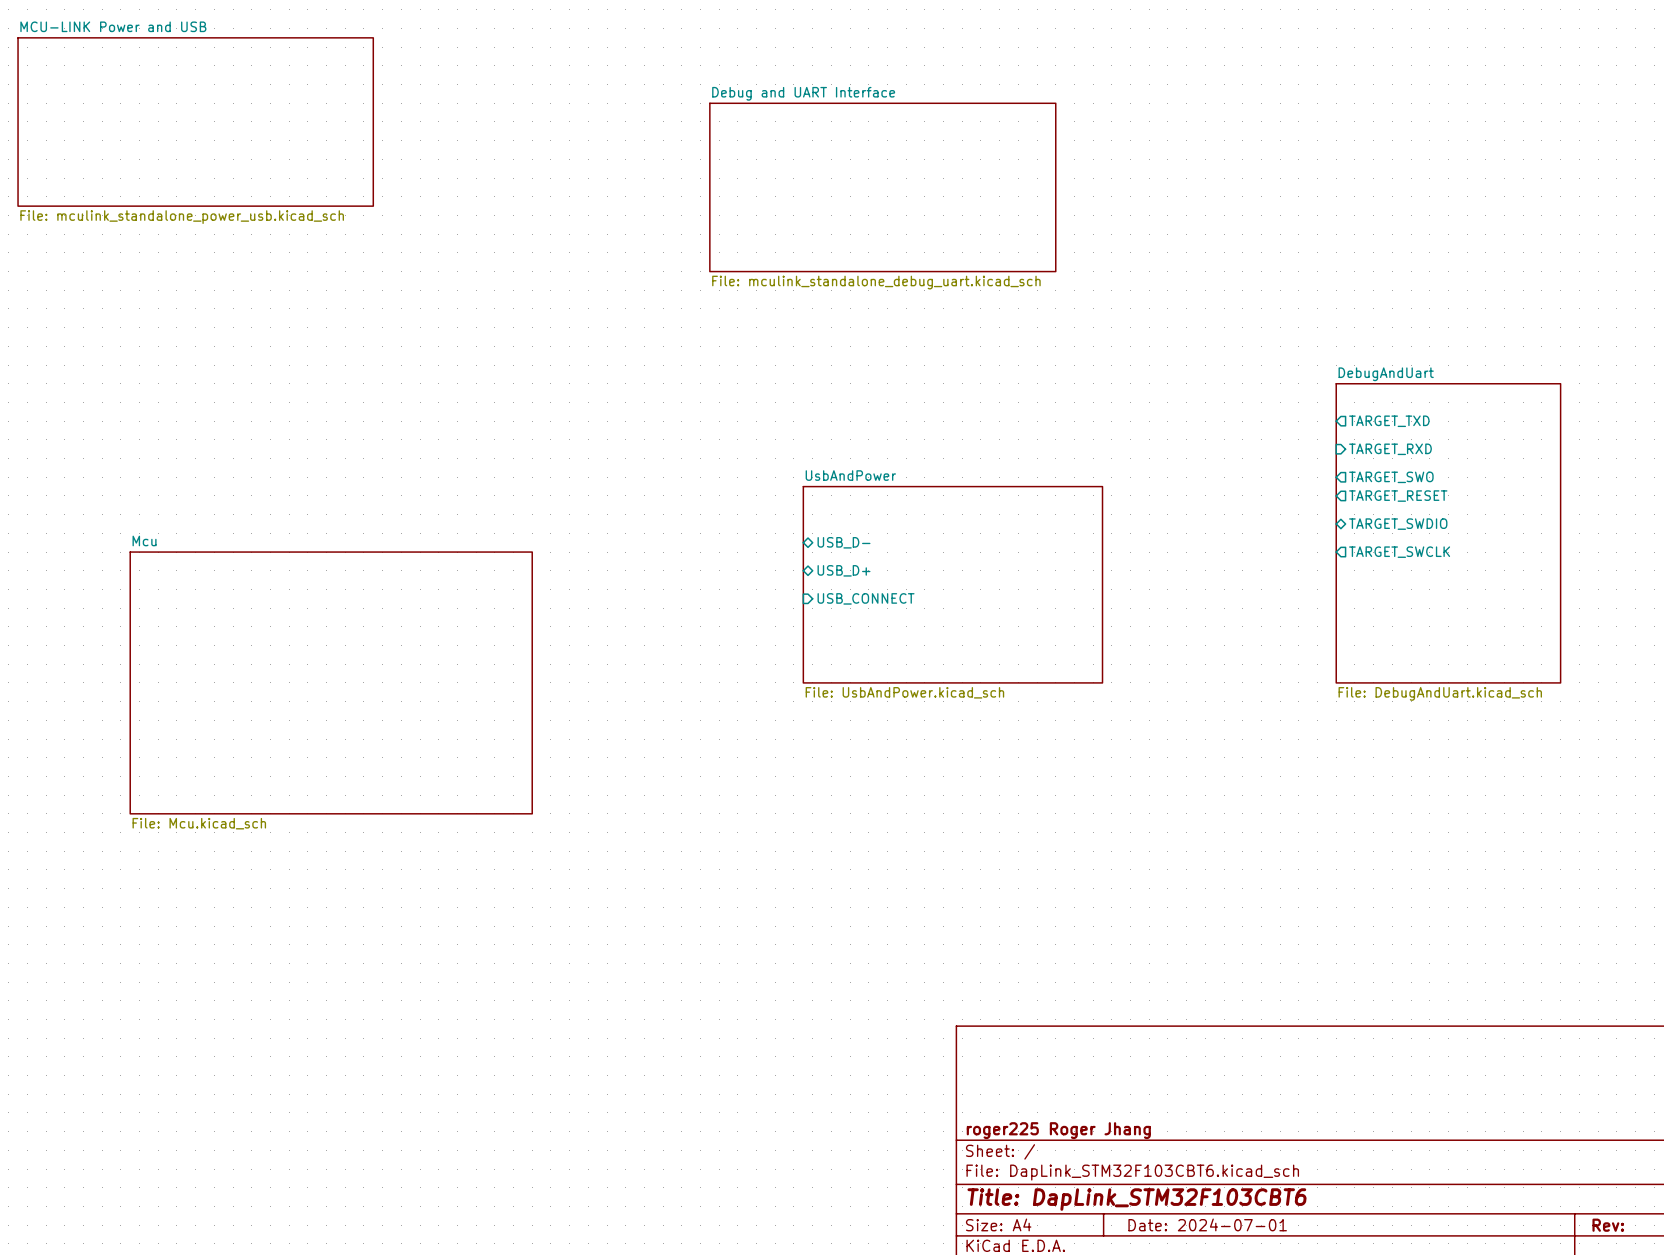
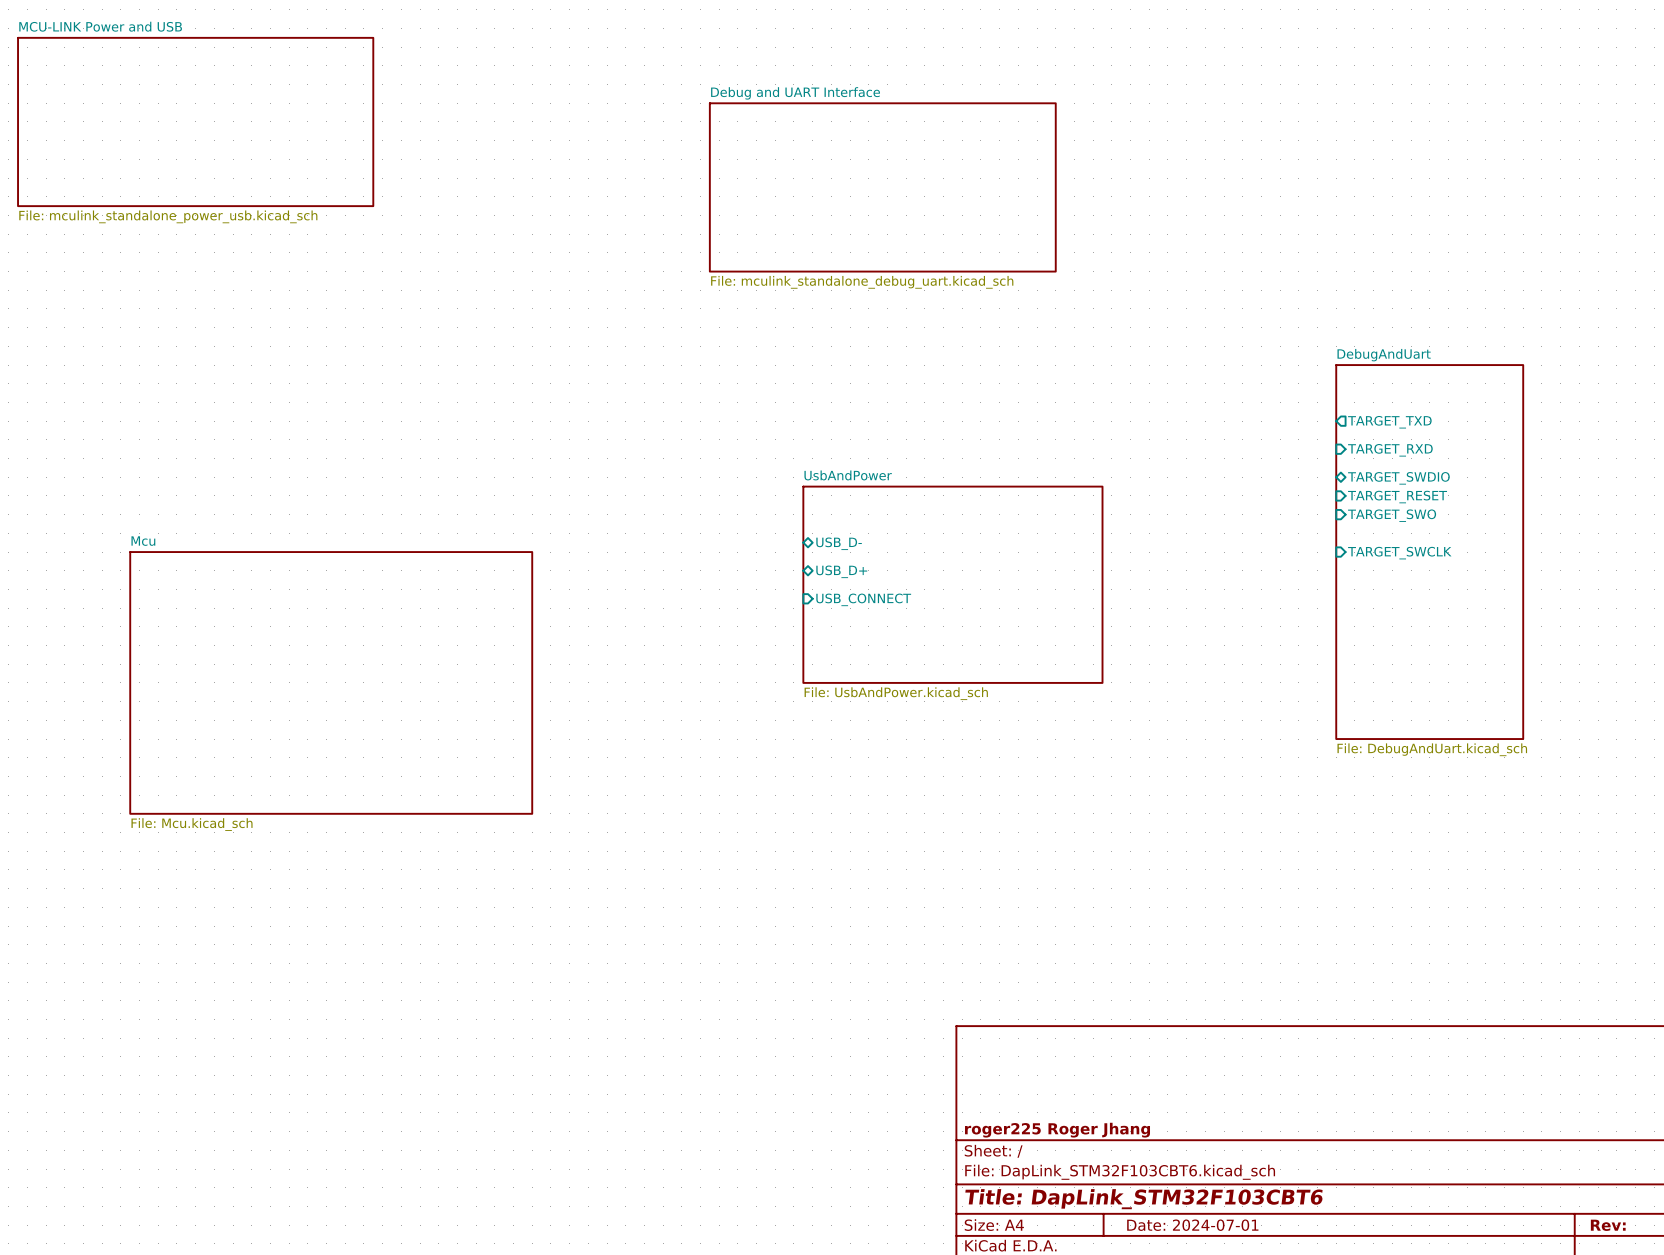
sheet pin shape: output (1391, 477) -> bidirectional (1398, 478)
sheet pin: TARGET_SWO (1391, 477) -> TARGET_SWDIO (1398, 478)
sheet pin shape: output (1398, 496) -> input (1397, 497)
sheet pin shape: bidirectional (1398, 524) -> input (1392, 515)
sheet pin: TARGET_SWDIO (1398, 524) -> TARGET_SWO (1392, 515)
sheet DebugAndUart: File: DebugAndUart.kicad_sch (1448, 533) -> none
sheet pin shape: output (1399, 552) -> input (1399, 553)
sheet DebugAndUart: none -> File: DebugAndUart.kicad_sch (1429, 552)

